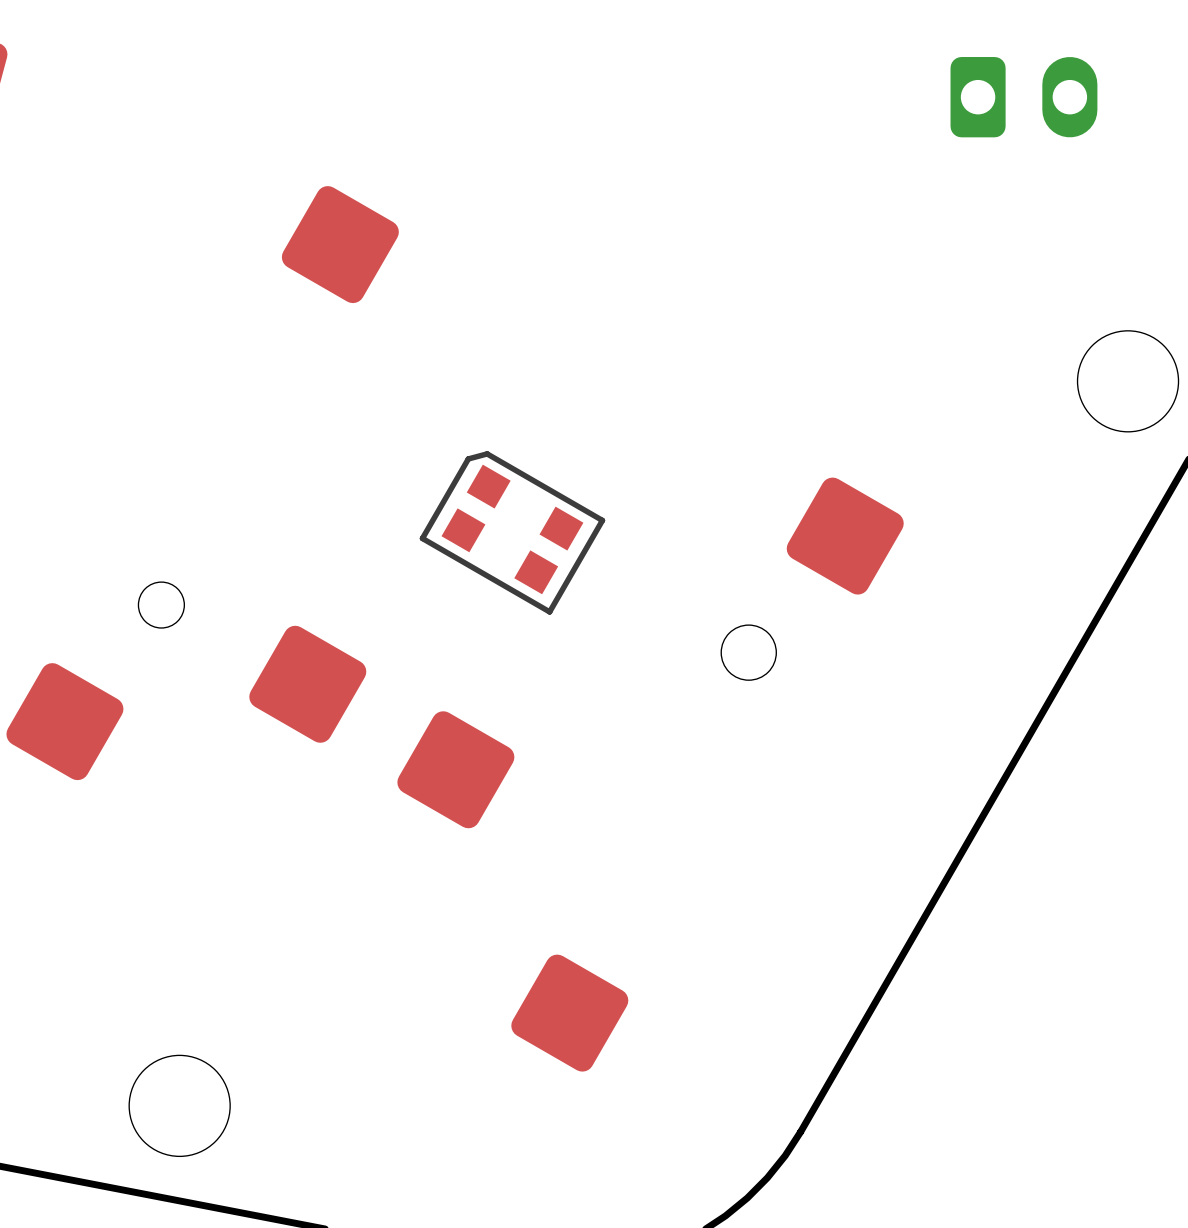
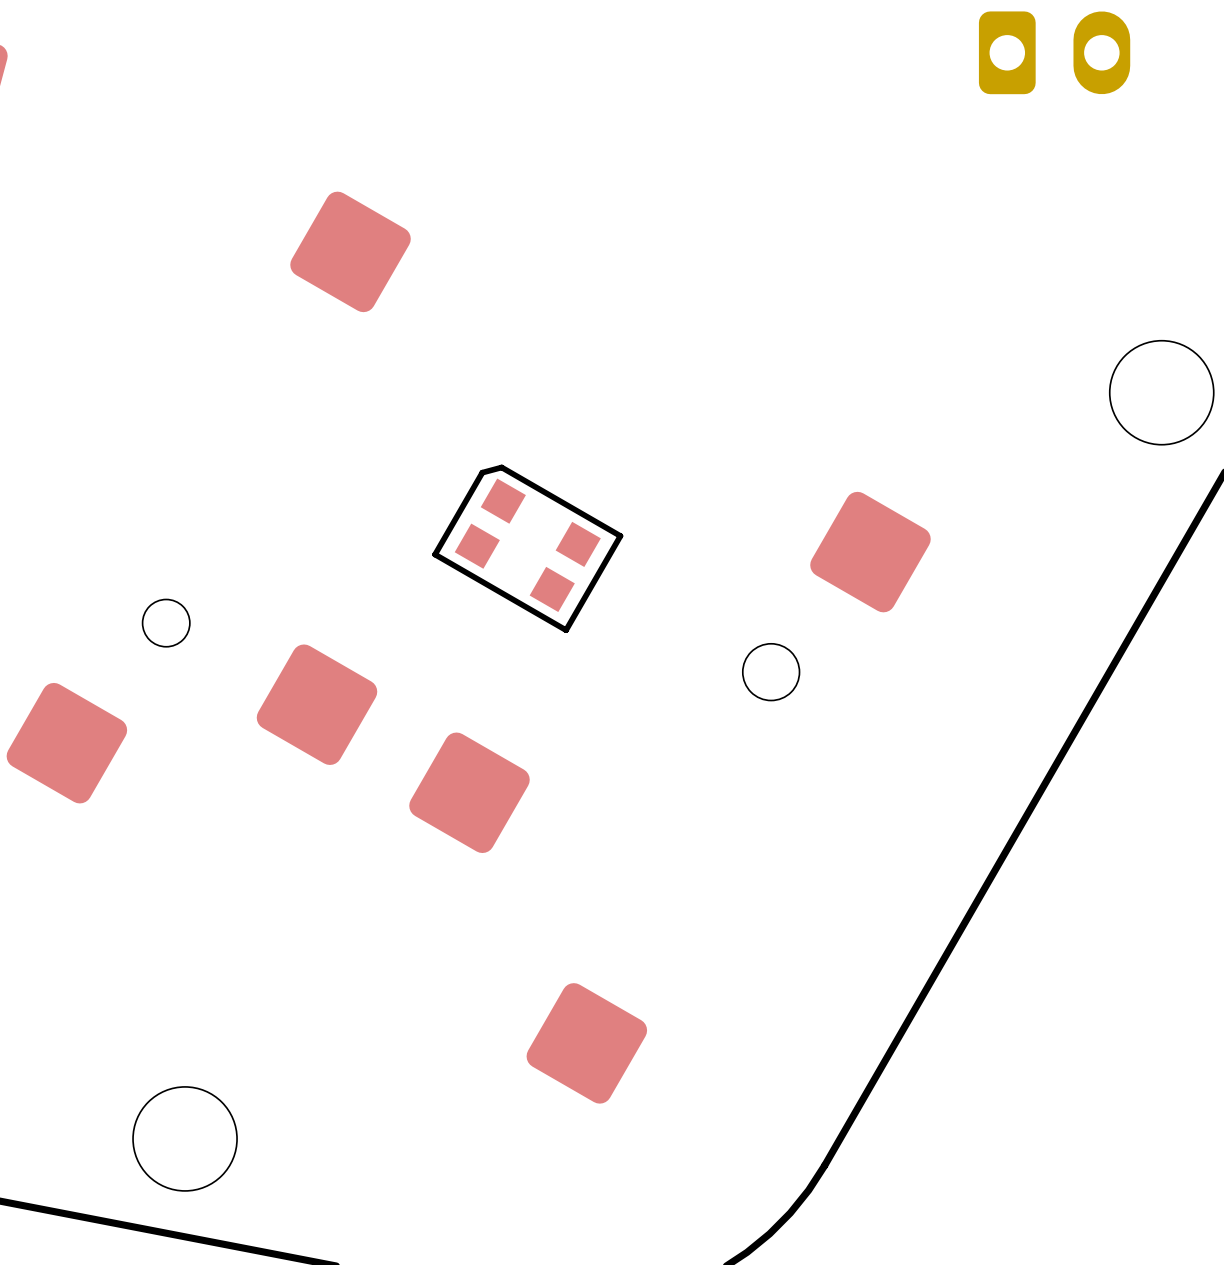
part position: (1023, 97) -> (1054, 52)

